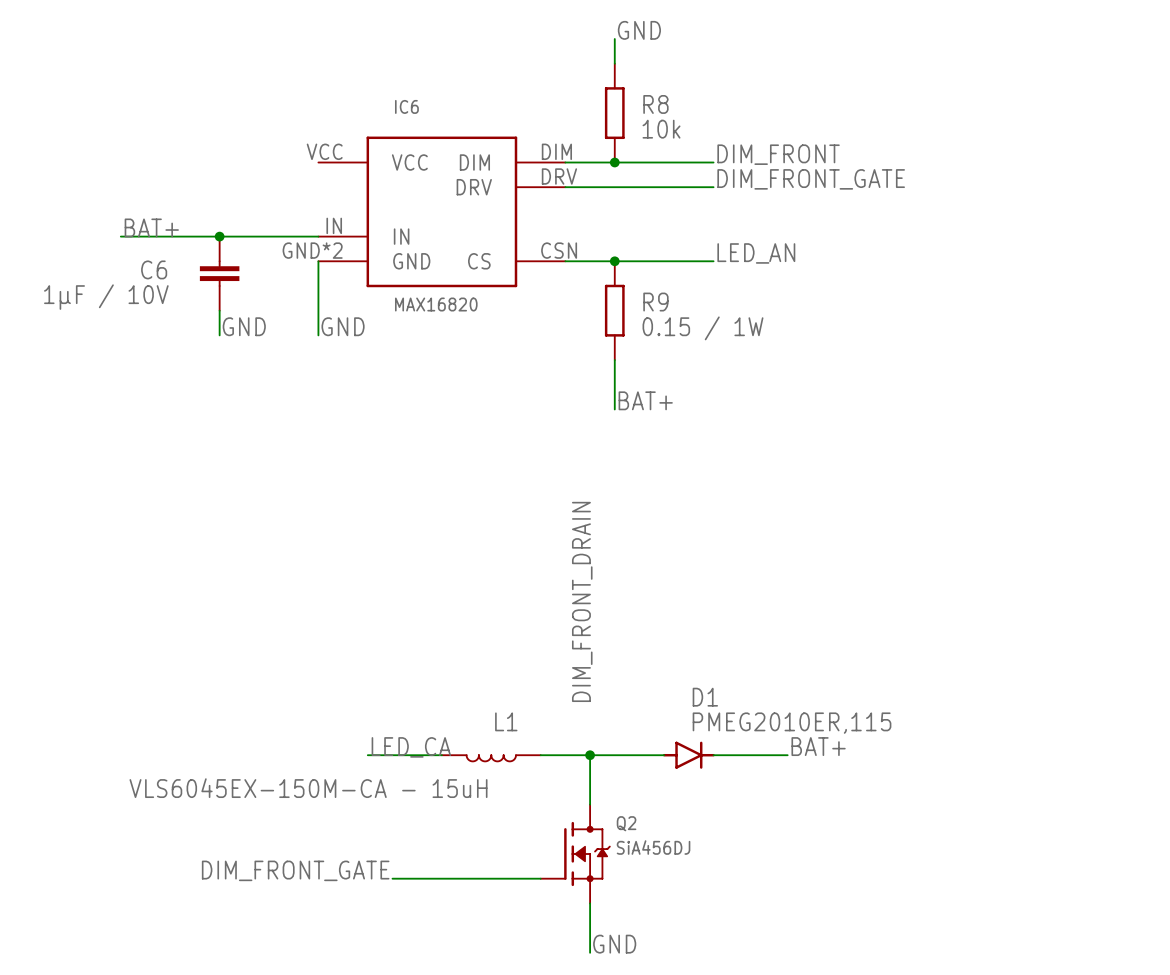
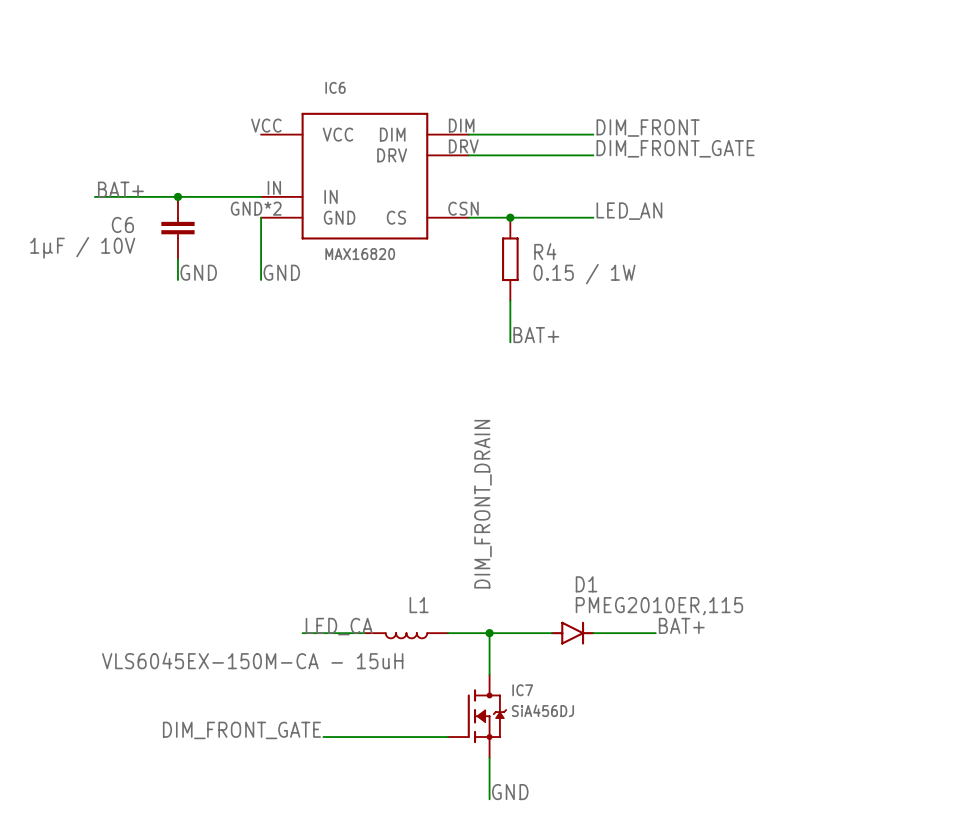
label: GND (639, 30) -> none
wire: (614, 39) (614, 63) -> none
R8: 10k (614, 113) -> none
junction: (614, 162) -> none
R9 name: R9 (655, 302) -> R4 (545, 251)
Q2 name: Q2 (626, 823) -> IC7 (522, 690)

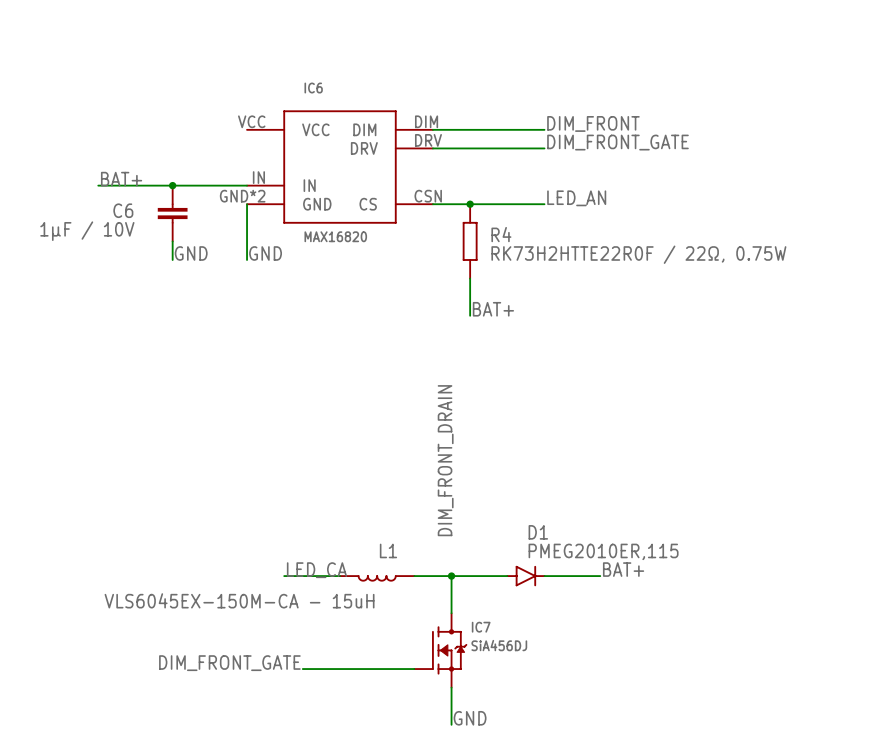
R4 value: 0.15 / 1W (584, 274) -> RK73H2HTTE22R0F / 22Ω, 0.75W (638, 254)

